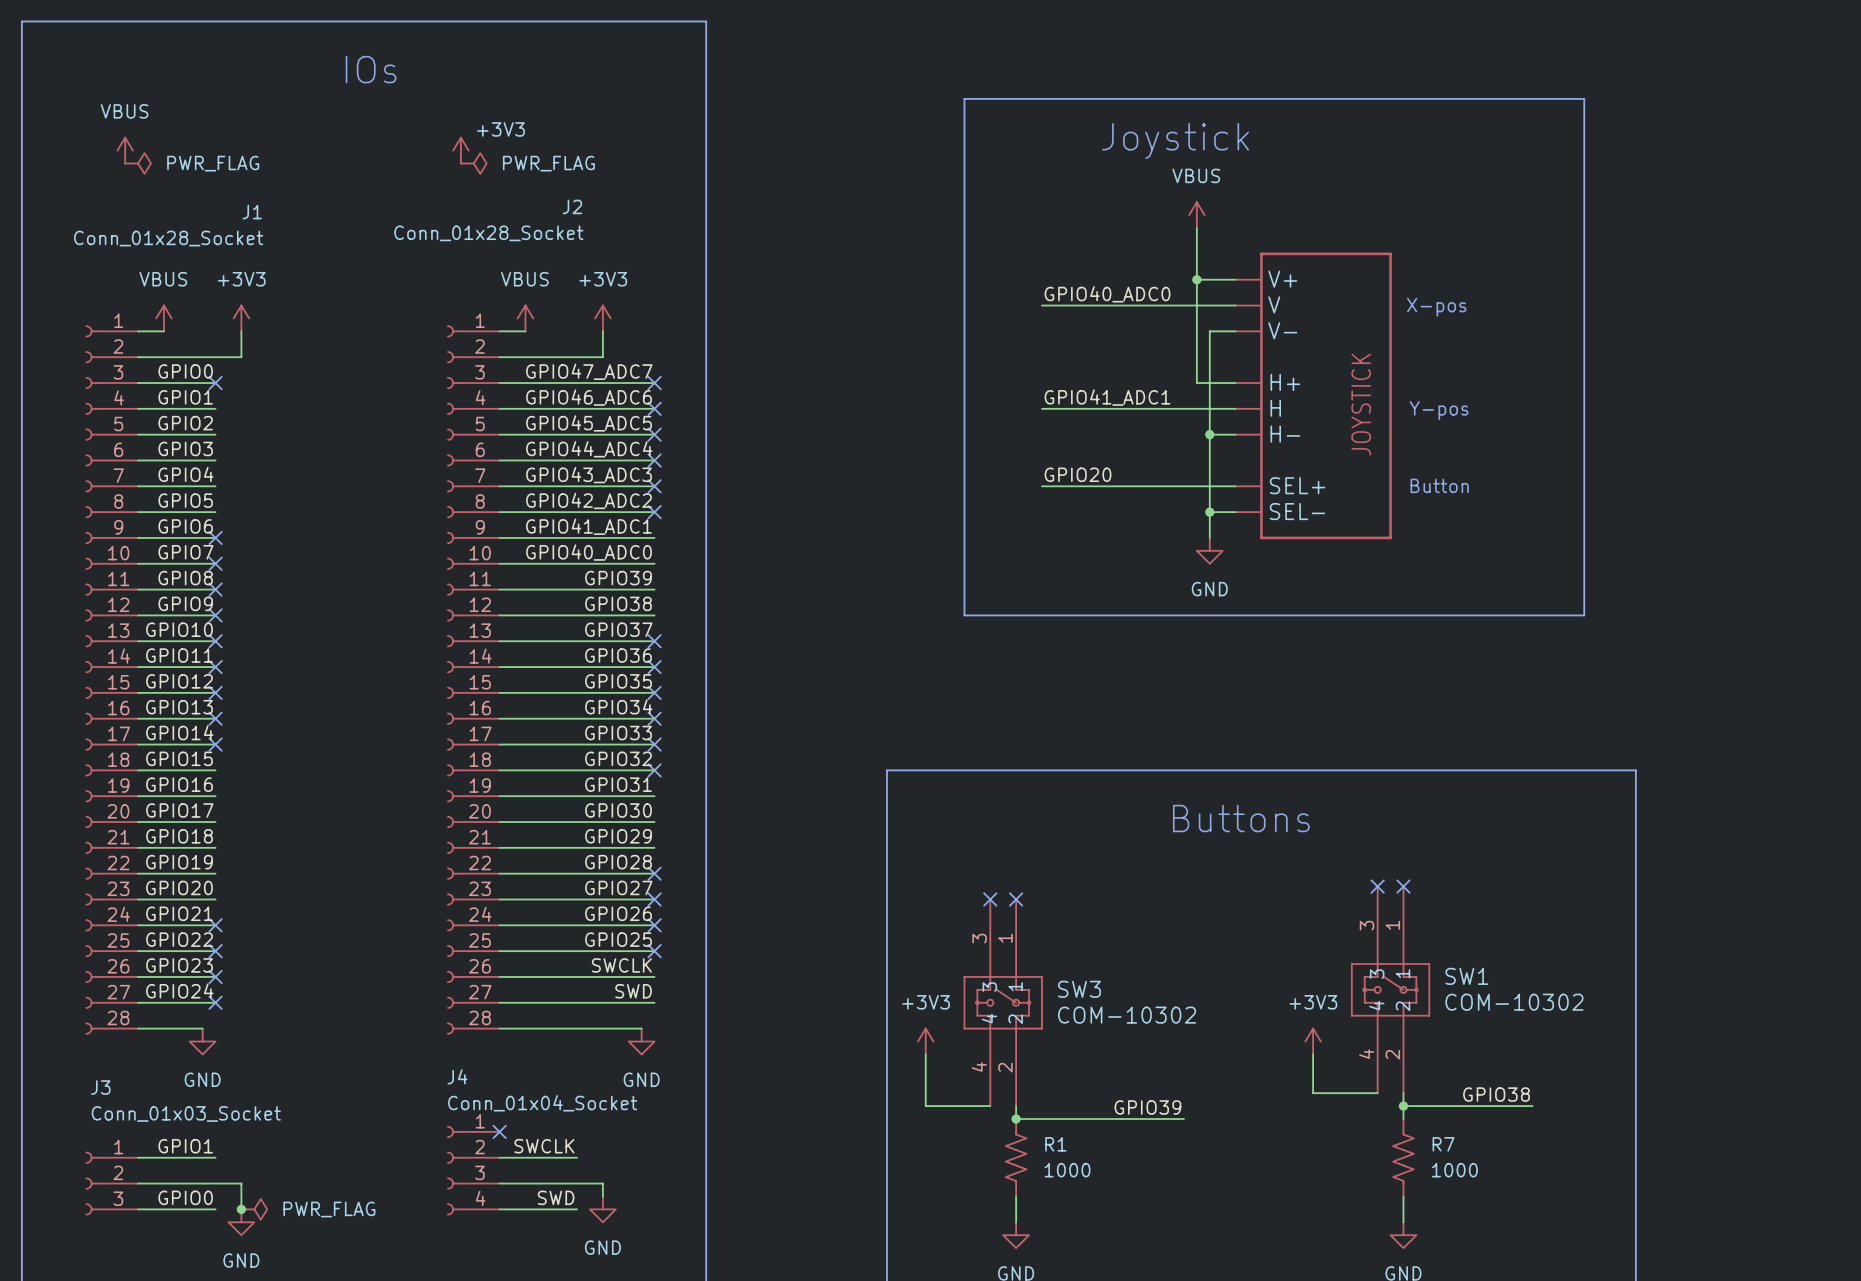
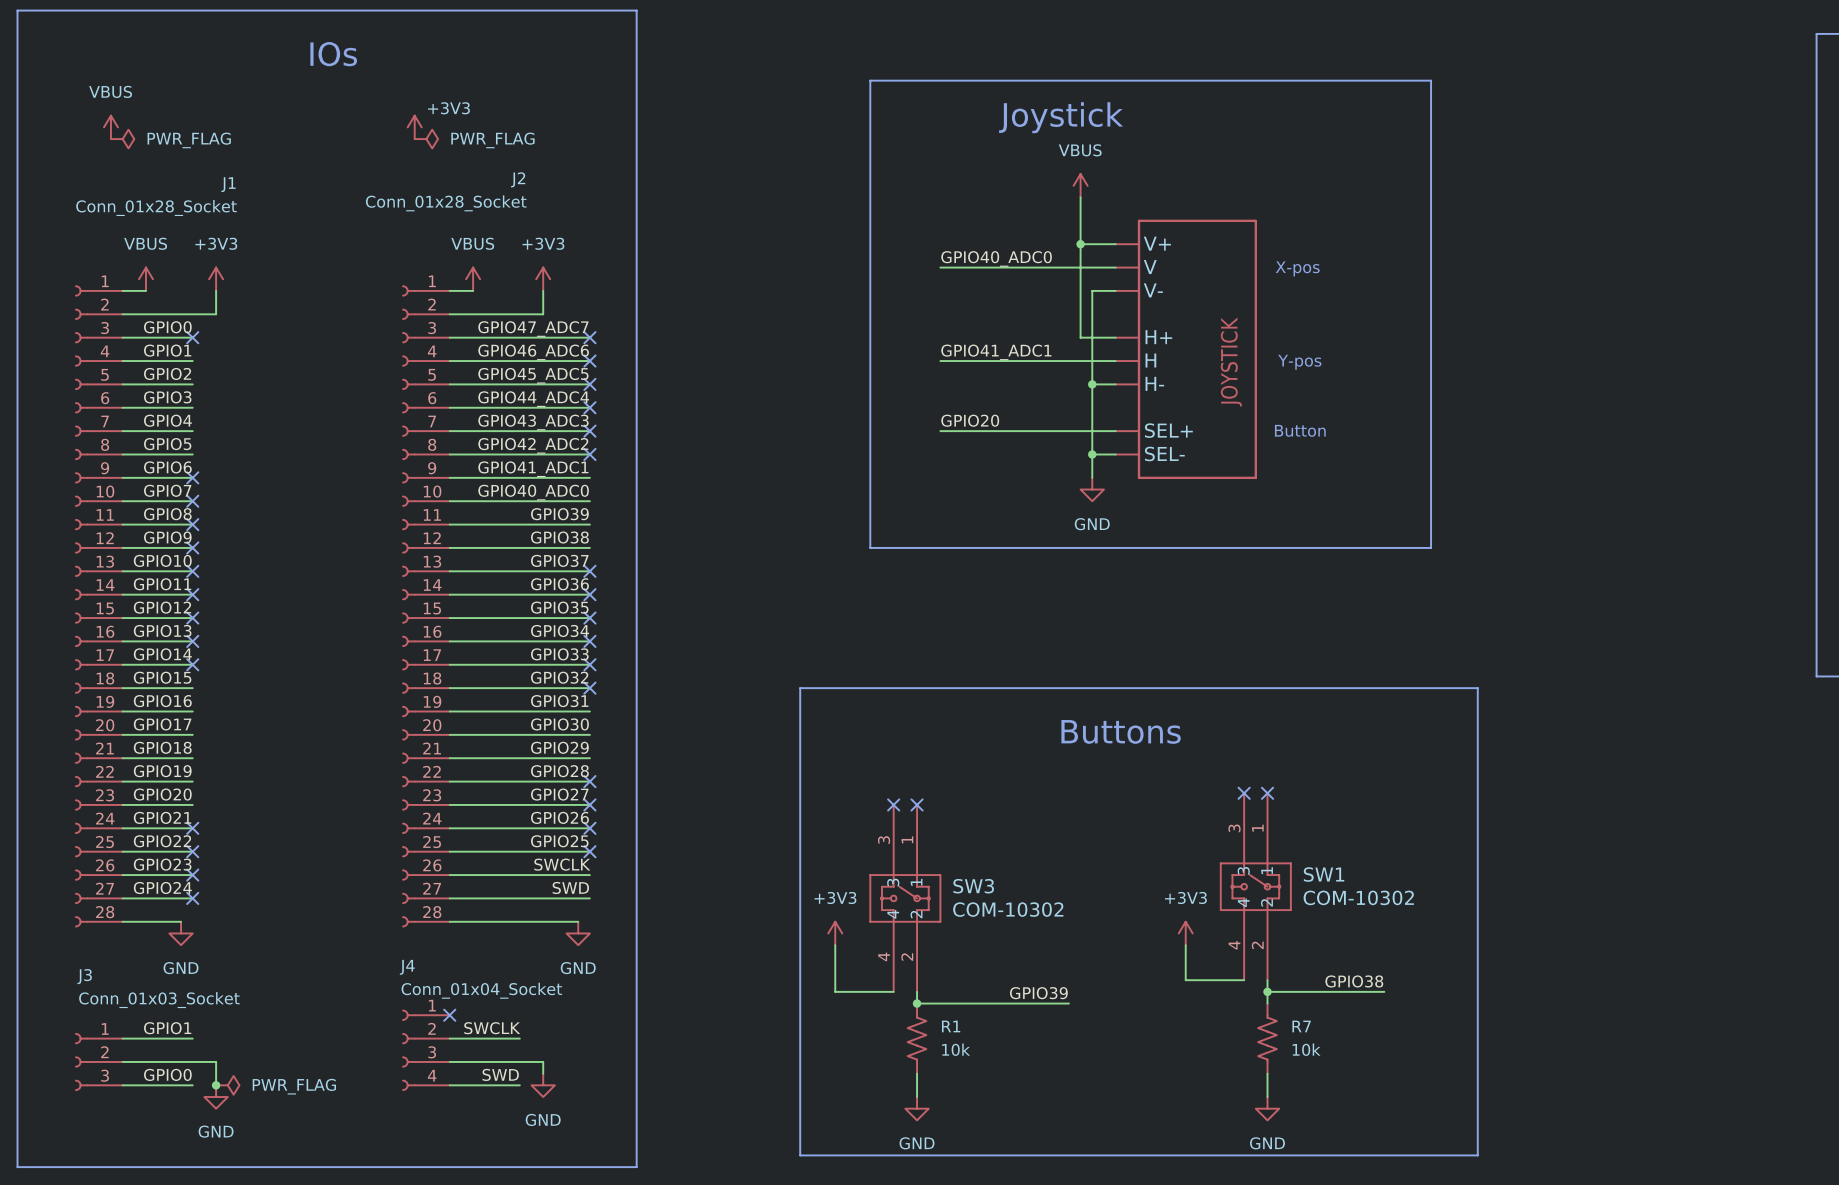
R1 value: 1000 (1067, 1170) -> 10k (956, 1049)
R7 value: 1000 (1454, 1170) -> 10k (1306, 1049)

